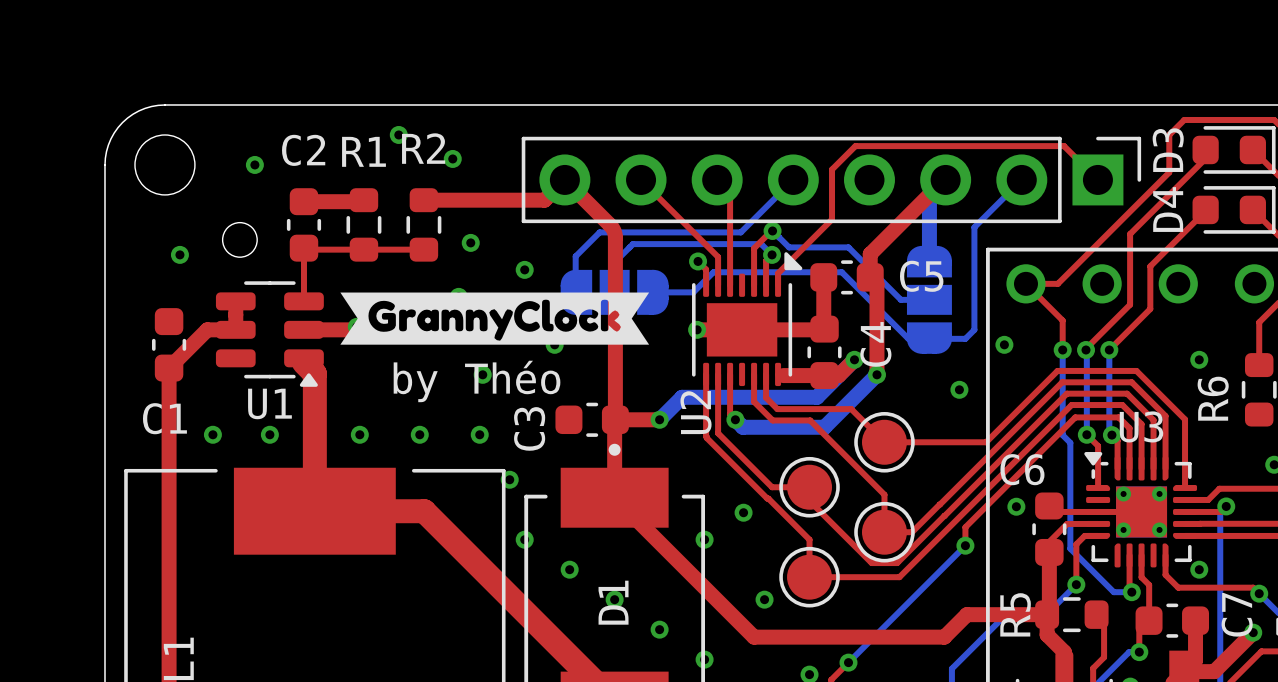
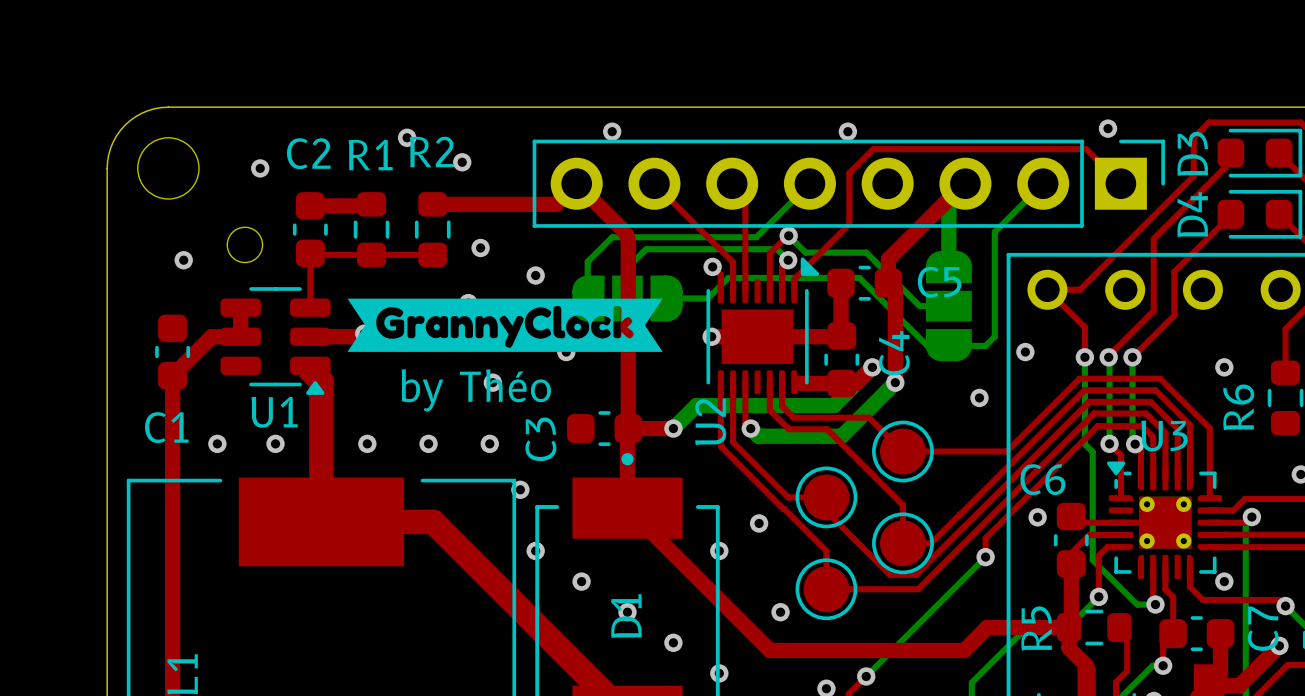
via: none -> (1108, 128)
via: none -> (612, 131)
via: none -> (847, 131)

